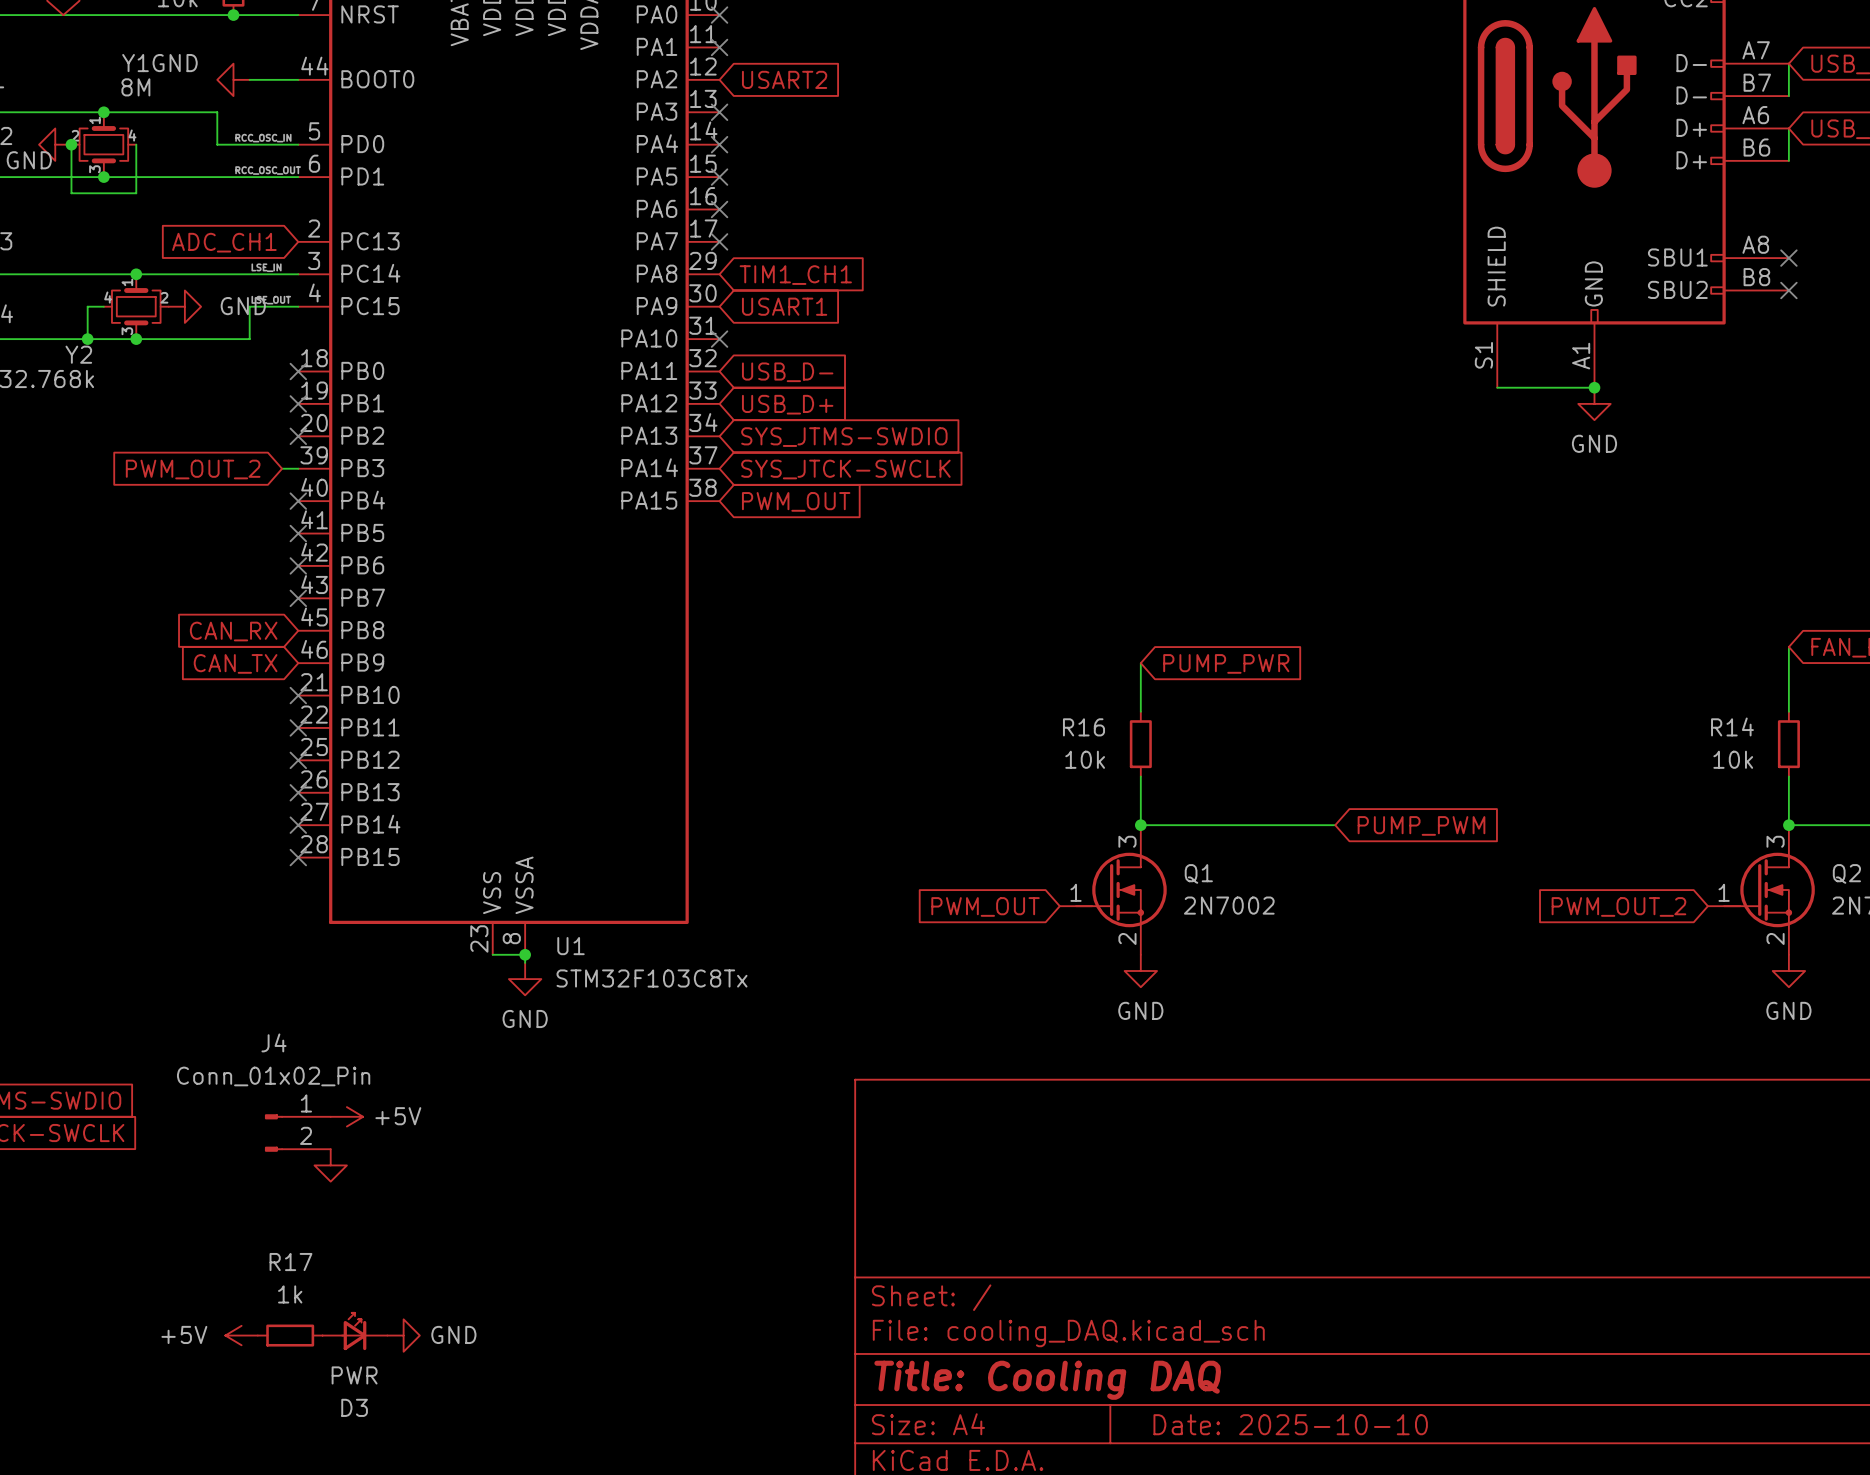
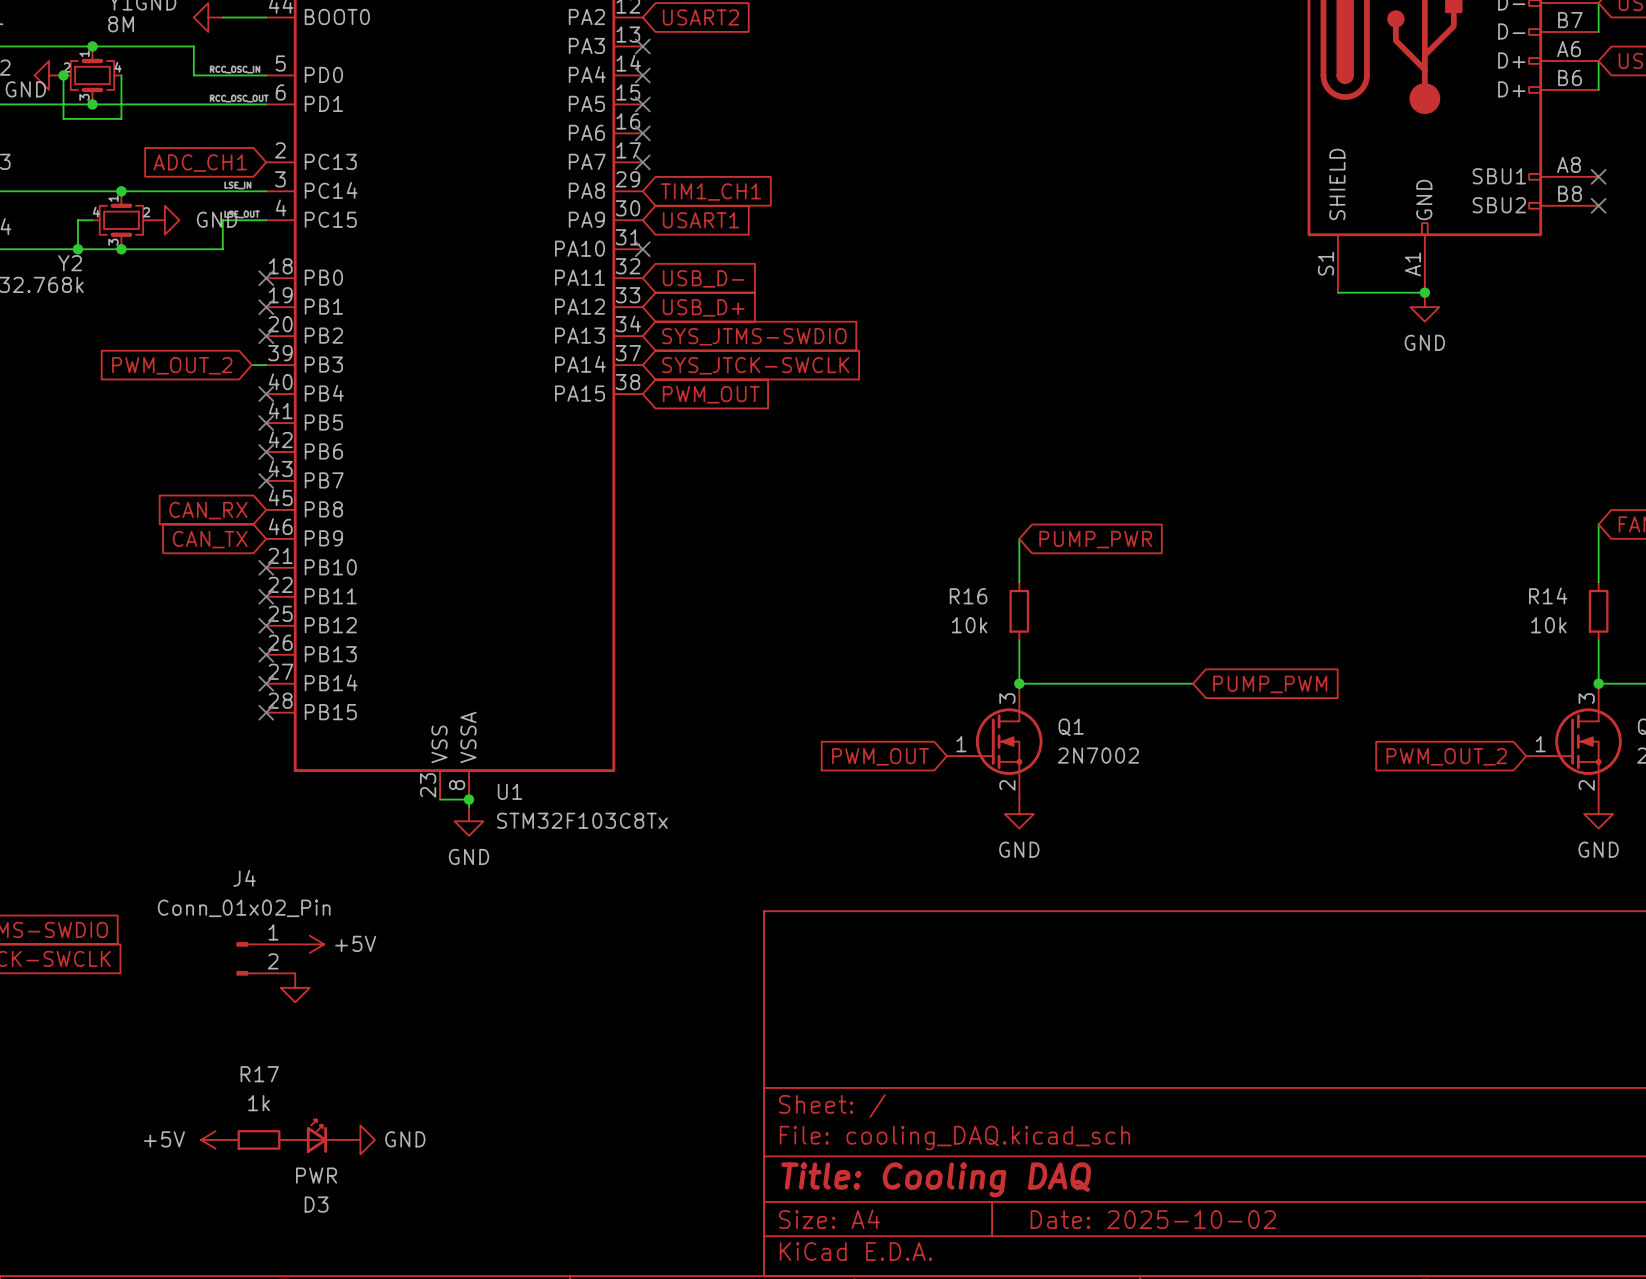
title block: Date: 2025-10-10 (1290, 1424) -> Date: 2025-10-02 (1153, 1219)

